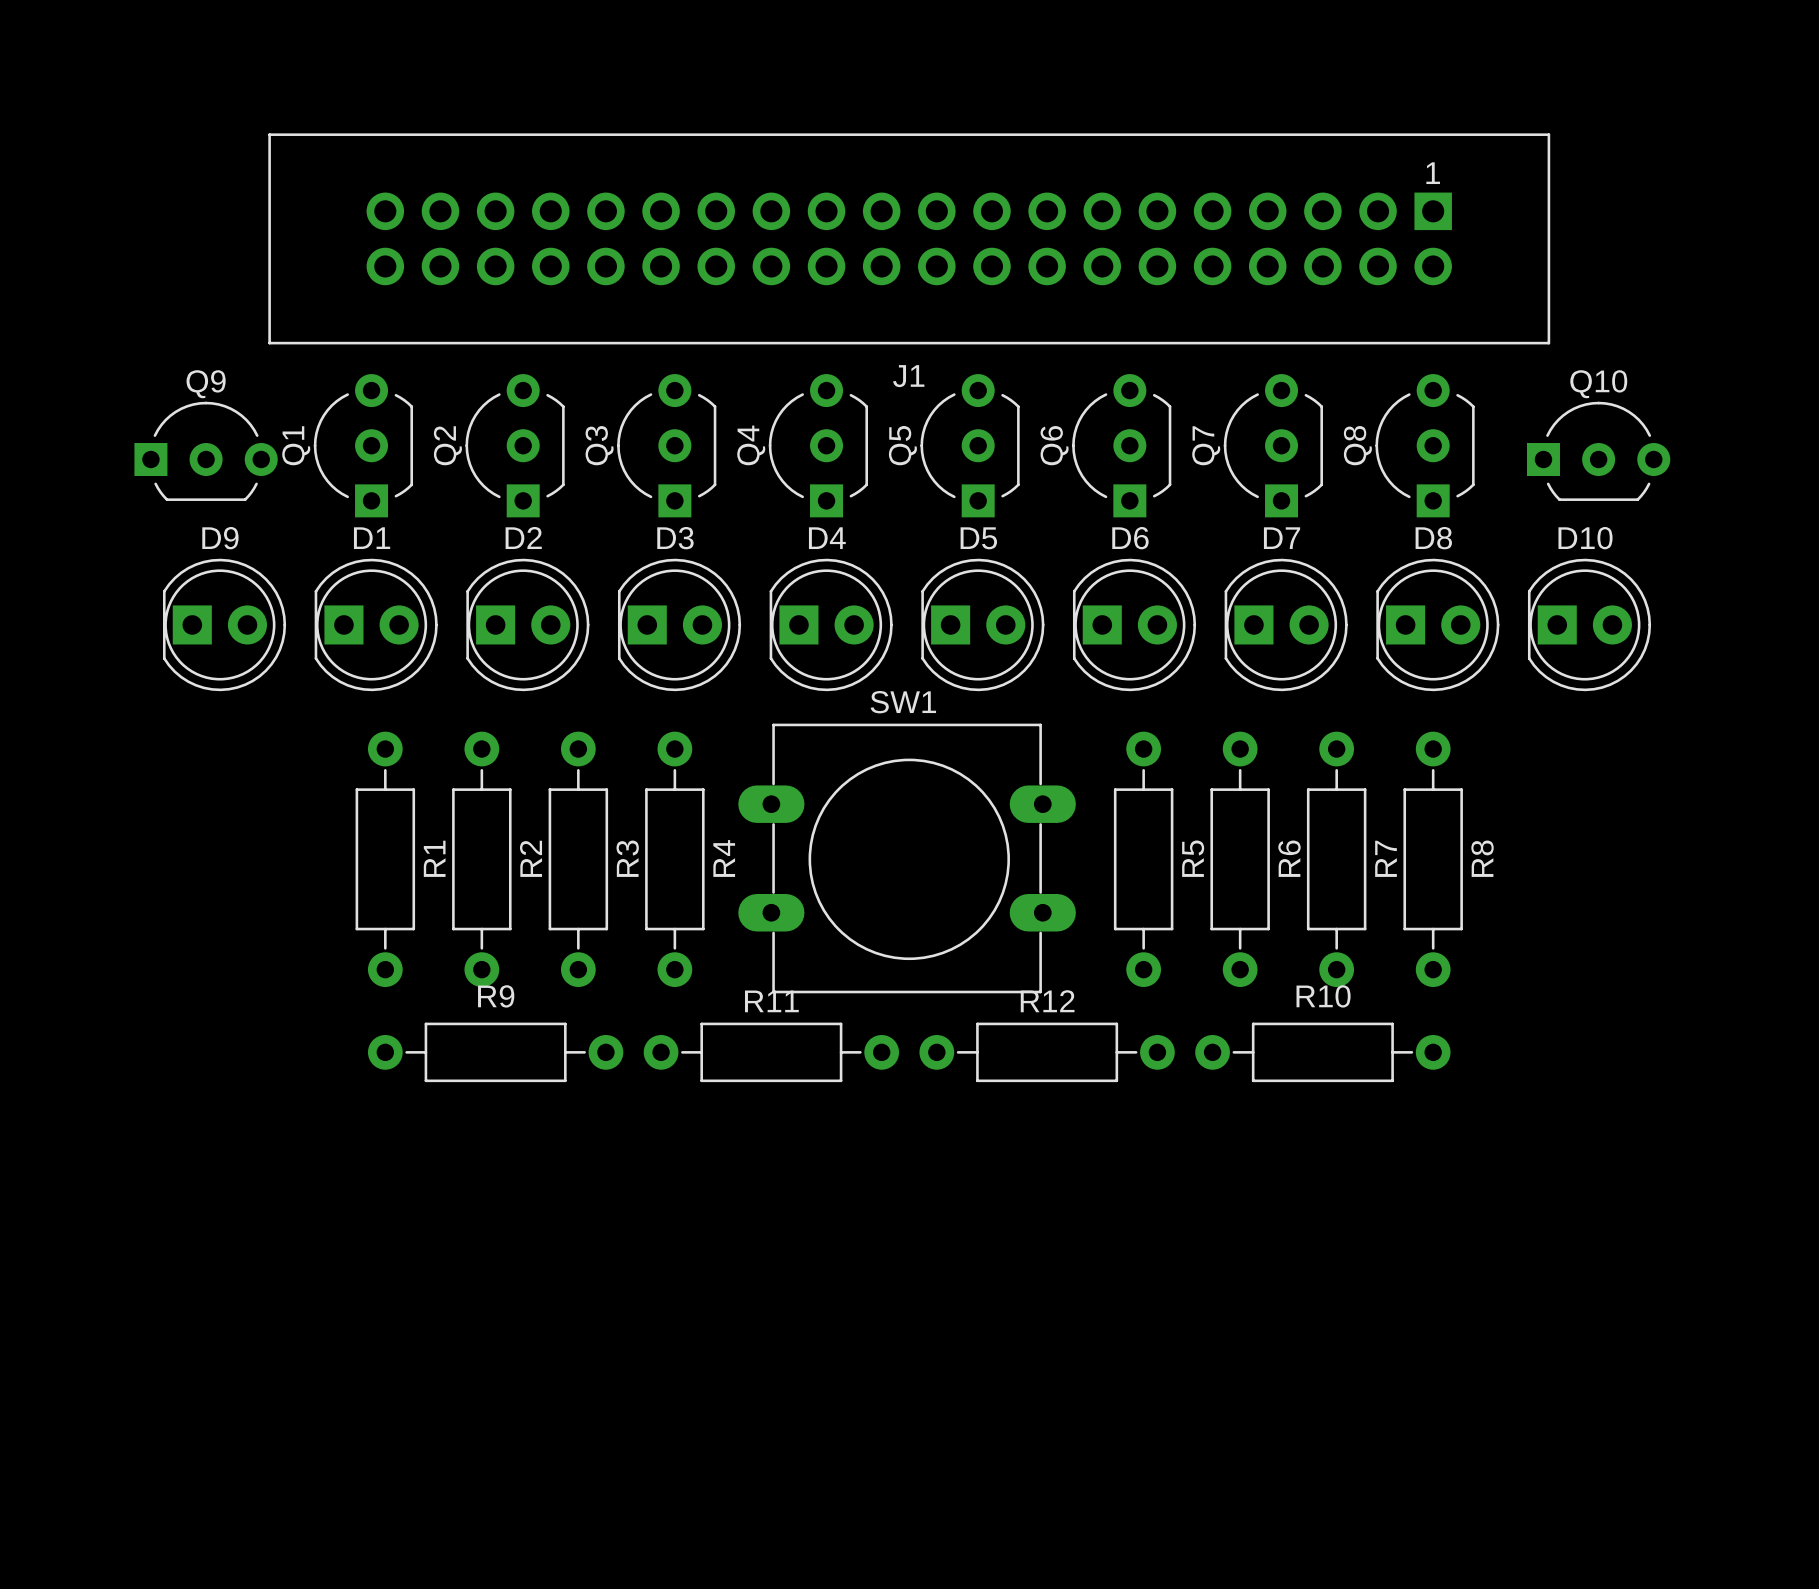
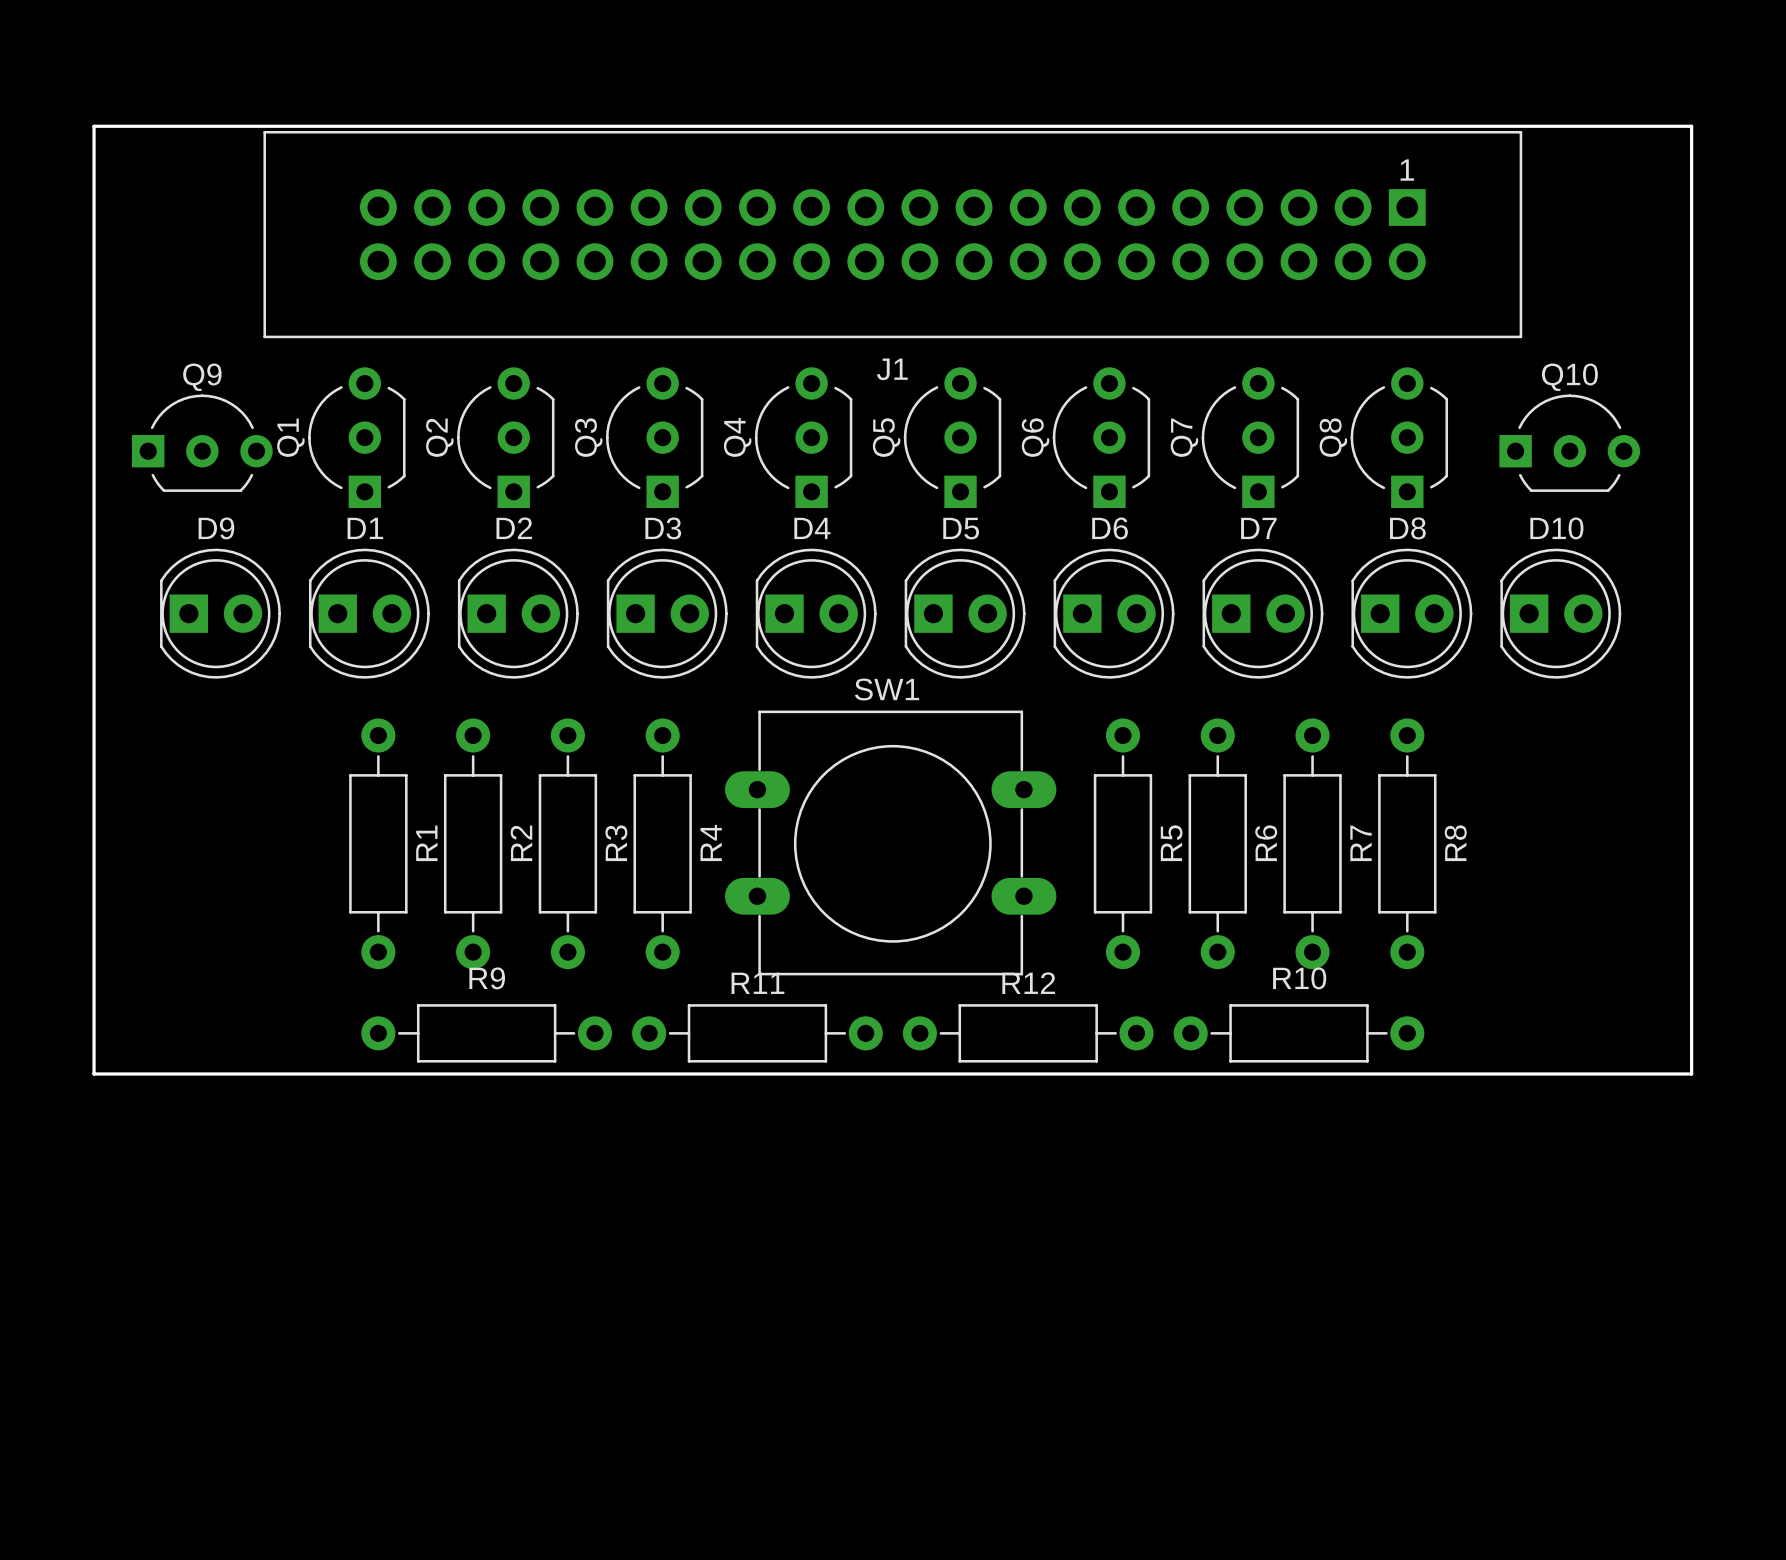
board edge: none -> (94, 126) (94, 1073) (1691, 1073) (1691, 126) (94, 126)

